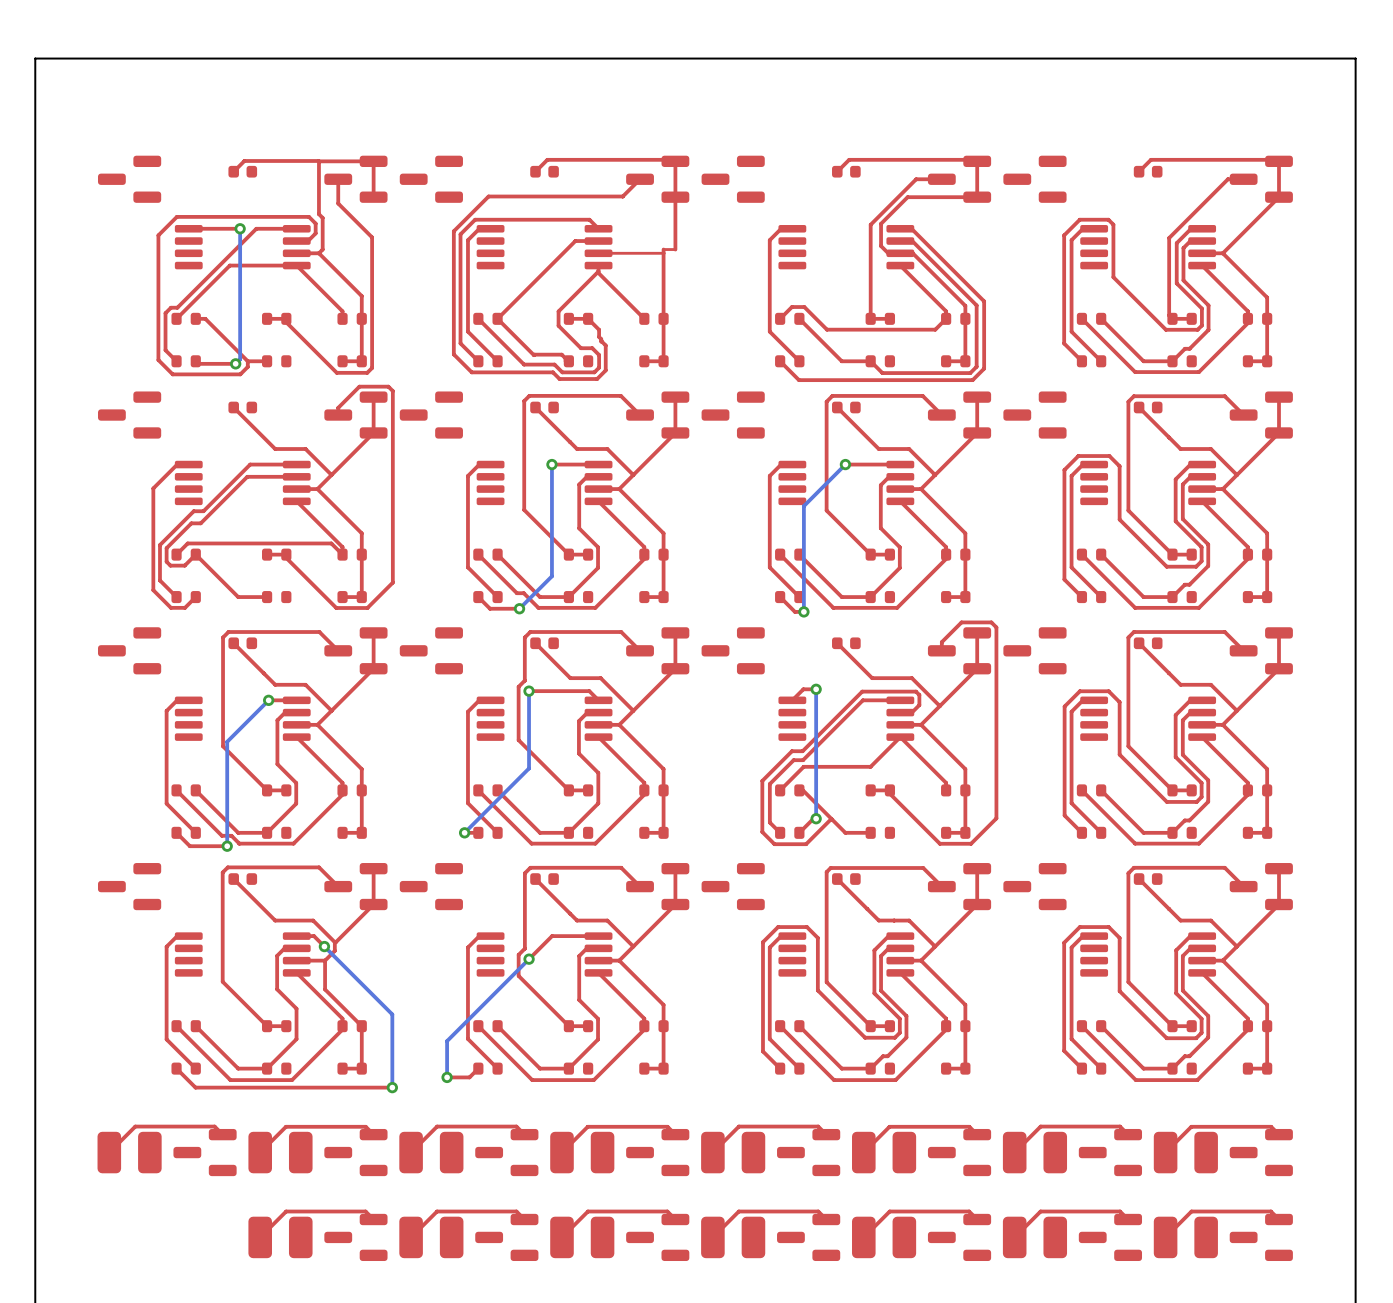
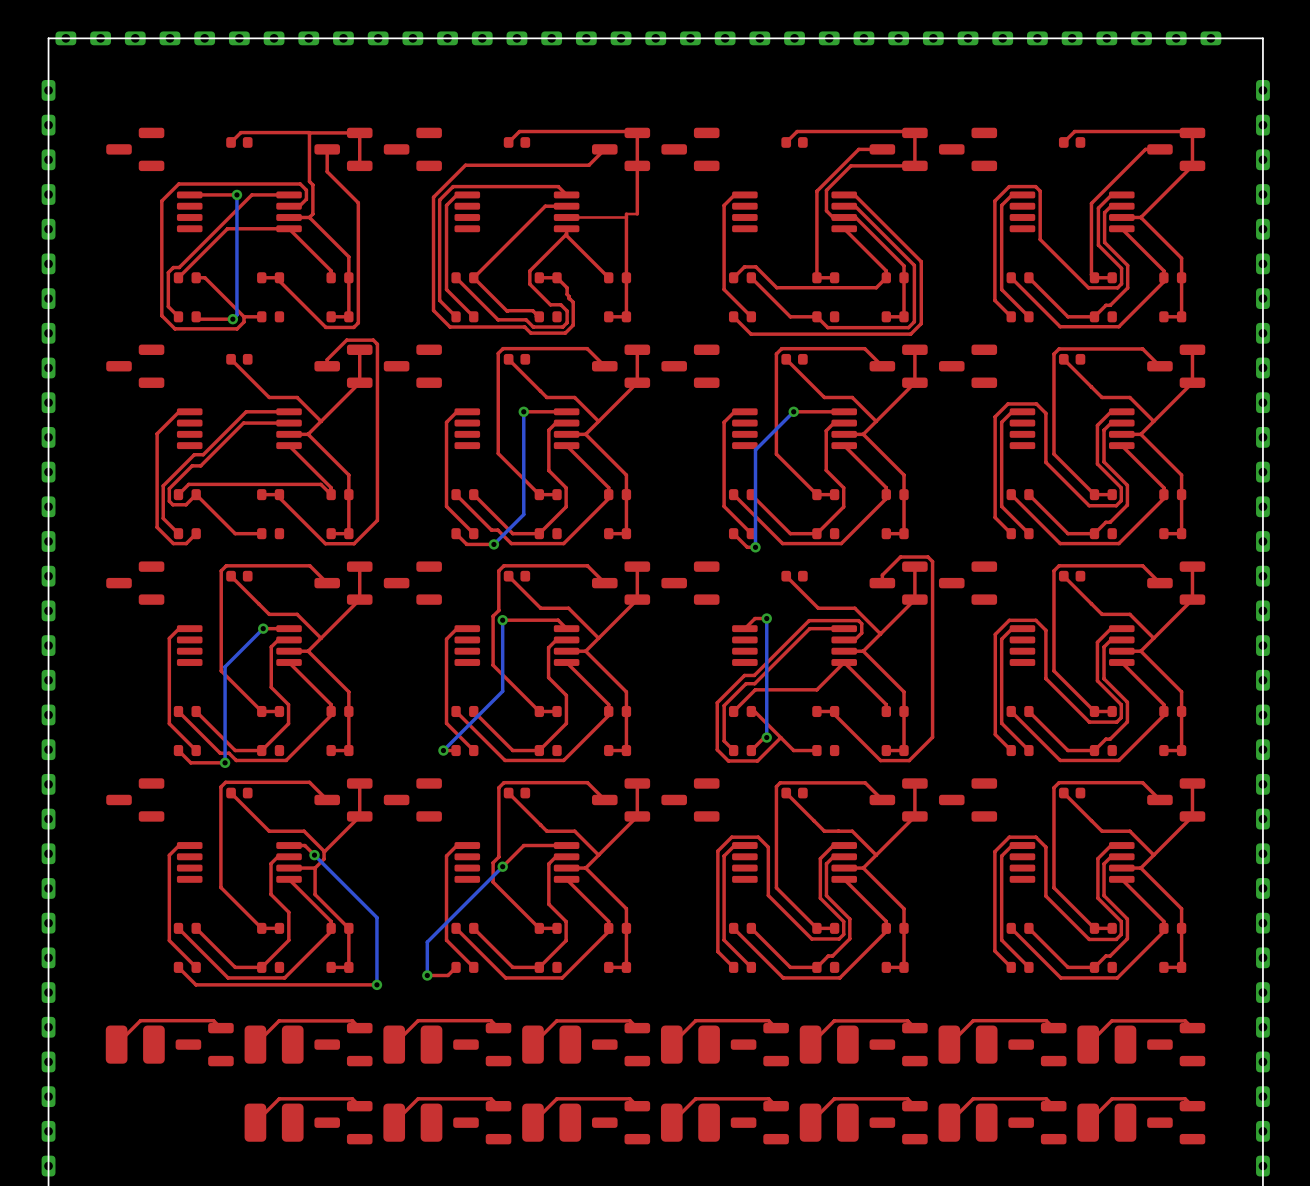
part: none -> (65, 38)
part: none -> (100, 38)
part: none -> (135, 38)
part: none -> (169, 38)
part: none -> (204, 38)
part: none -> (239, 38)
part: none -> (274, 38)
part: none -> (308, 38)
part: none -> (343, 38)
part: none -> (378, 38)
part: none -> (412, 38)
part: none -> (447, 38)
part: none -> (482, 38)
part: none -> (516, 38)
part: none -> (551, 38)
part: none -> (586, 38)
part: none -> (621, 38)
part: none -> (655, 38)
part: none -> (690, 38)
part: none -> (725, 38)
part: none -> (759, 38)
part: none -> (794, 38)
part: none -> (829, 38)
part: none -> (863, 38)
part: none -> (898, 38)
part: none -> (933, 38)
part: none -> (968, 38)
part: none -> (1002, 38)
part: none -> (1037, 38)
part: none -> (1072, 38)
part: none -> (1106, 38)
part: none -> (1141, 38)
part: none -> (1176, 38)
part: none -> (1210, 38)
part: none -> (48, 90)
part: none -> (1262, 90)
part: none -> (48, 125)
part: none -> (1262, 125)
part: none -> (48, 159)
part: none -> (1262, 159)
part: none -> (48, 194)
part: none -> (1262, 194)
part: none -> (48, 229)
part: none -> (1262, 229)
part: none -> (48, 263)
part: none -> (1262, 263)
part: none -> (48, 298)
part: none -> (1262, 298)
part: none -> (48, 333)
part: none -> (1262, 333)
part: none -> (48, 367)
part: none -> (1262, 367)
part: none -> (48, 402)
part: none -> (1262, 402)
part: none -> (48, 437)
part: none -> (1262, 437)
part: none -> (48, 472)
part: none -> (1262, 472)
part: none -> (48, 506)
part: none -> (1262, 506)
part: none -> (48, 541)
part: none -> (1262, 541)
part: none -> (48, 576)
part: none -> (1262, 576)
part: none -> (48, 610)
part: none -> (1262, 610)
part: none -> (48, 645)
part: none -> (1262, 645)
part: none -> (48, 680)
part: none -> (1262, 680)
part: none -> (48, 714)
part: none -> (1262, 714)
part: none -> (48, 749)
part: none -> (1262, 749)
part: none -> (48, 784)
part: none -> (1262, 784)
part: none -> (48, 819)
part: none -> (1262, 819)
part: none -> (48, 853)
part: none -> (1262, 853)
part: none -> (48, 888)
part: none -> (1262, 888)
part: none -> (48, 923)
part: none -> (1262, 923)
part: none -> (48, 957)
part: none -> (1262, 957)
part: none -> (48, 992)
part: none -> (1262, 992)
part: none -> (48, 1027)
part: none -> (1262, 1027)
part: none -> (48, 1061)
part: none -> (1262, 1061)
part: none -> (48, 1096)
part: none -> (1262, 1096)
part: none -> (48, 1131)
part: none -> (1262, 1131)
part: none -> (48, 1166)
part: none -> (1262, 1166)

